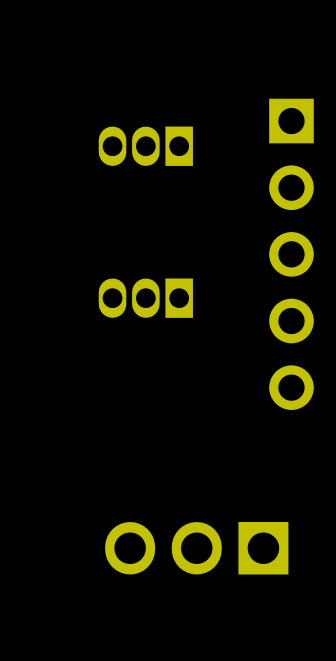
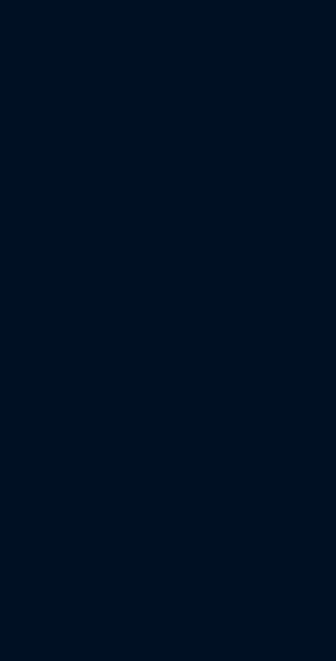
part: (145, 146) -> none
part: (291, 254) -> none
part: (145, 298) -> none
part: (196, 548) -> none

